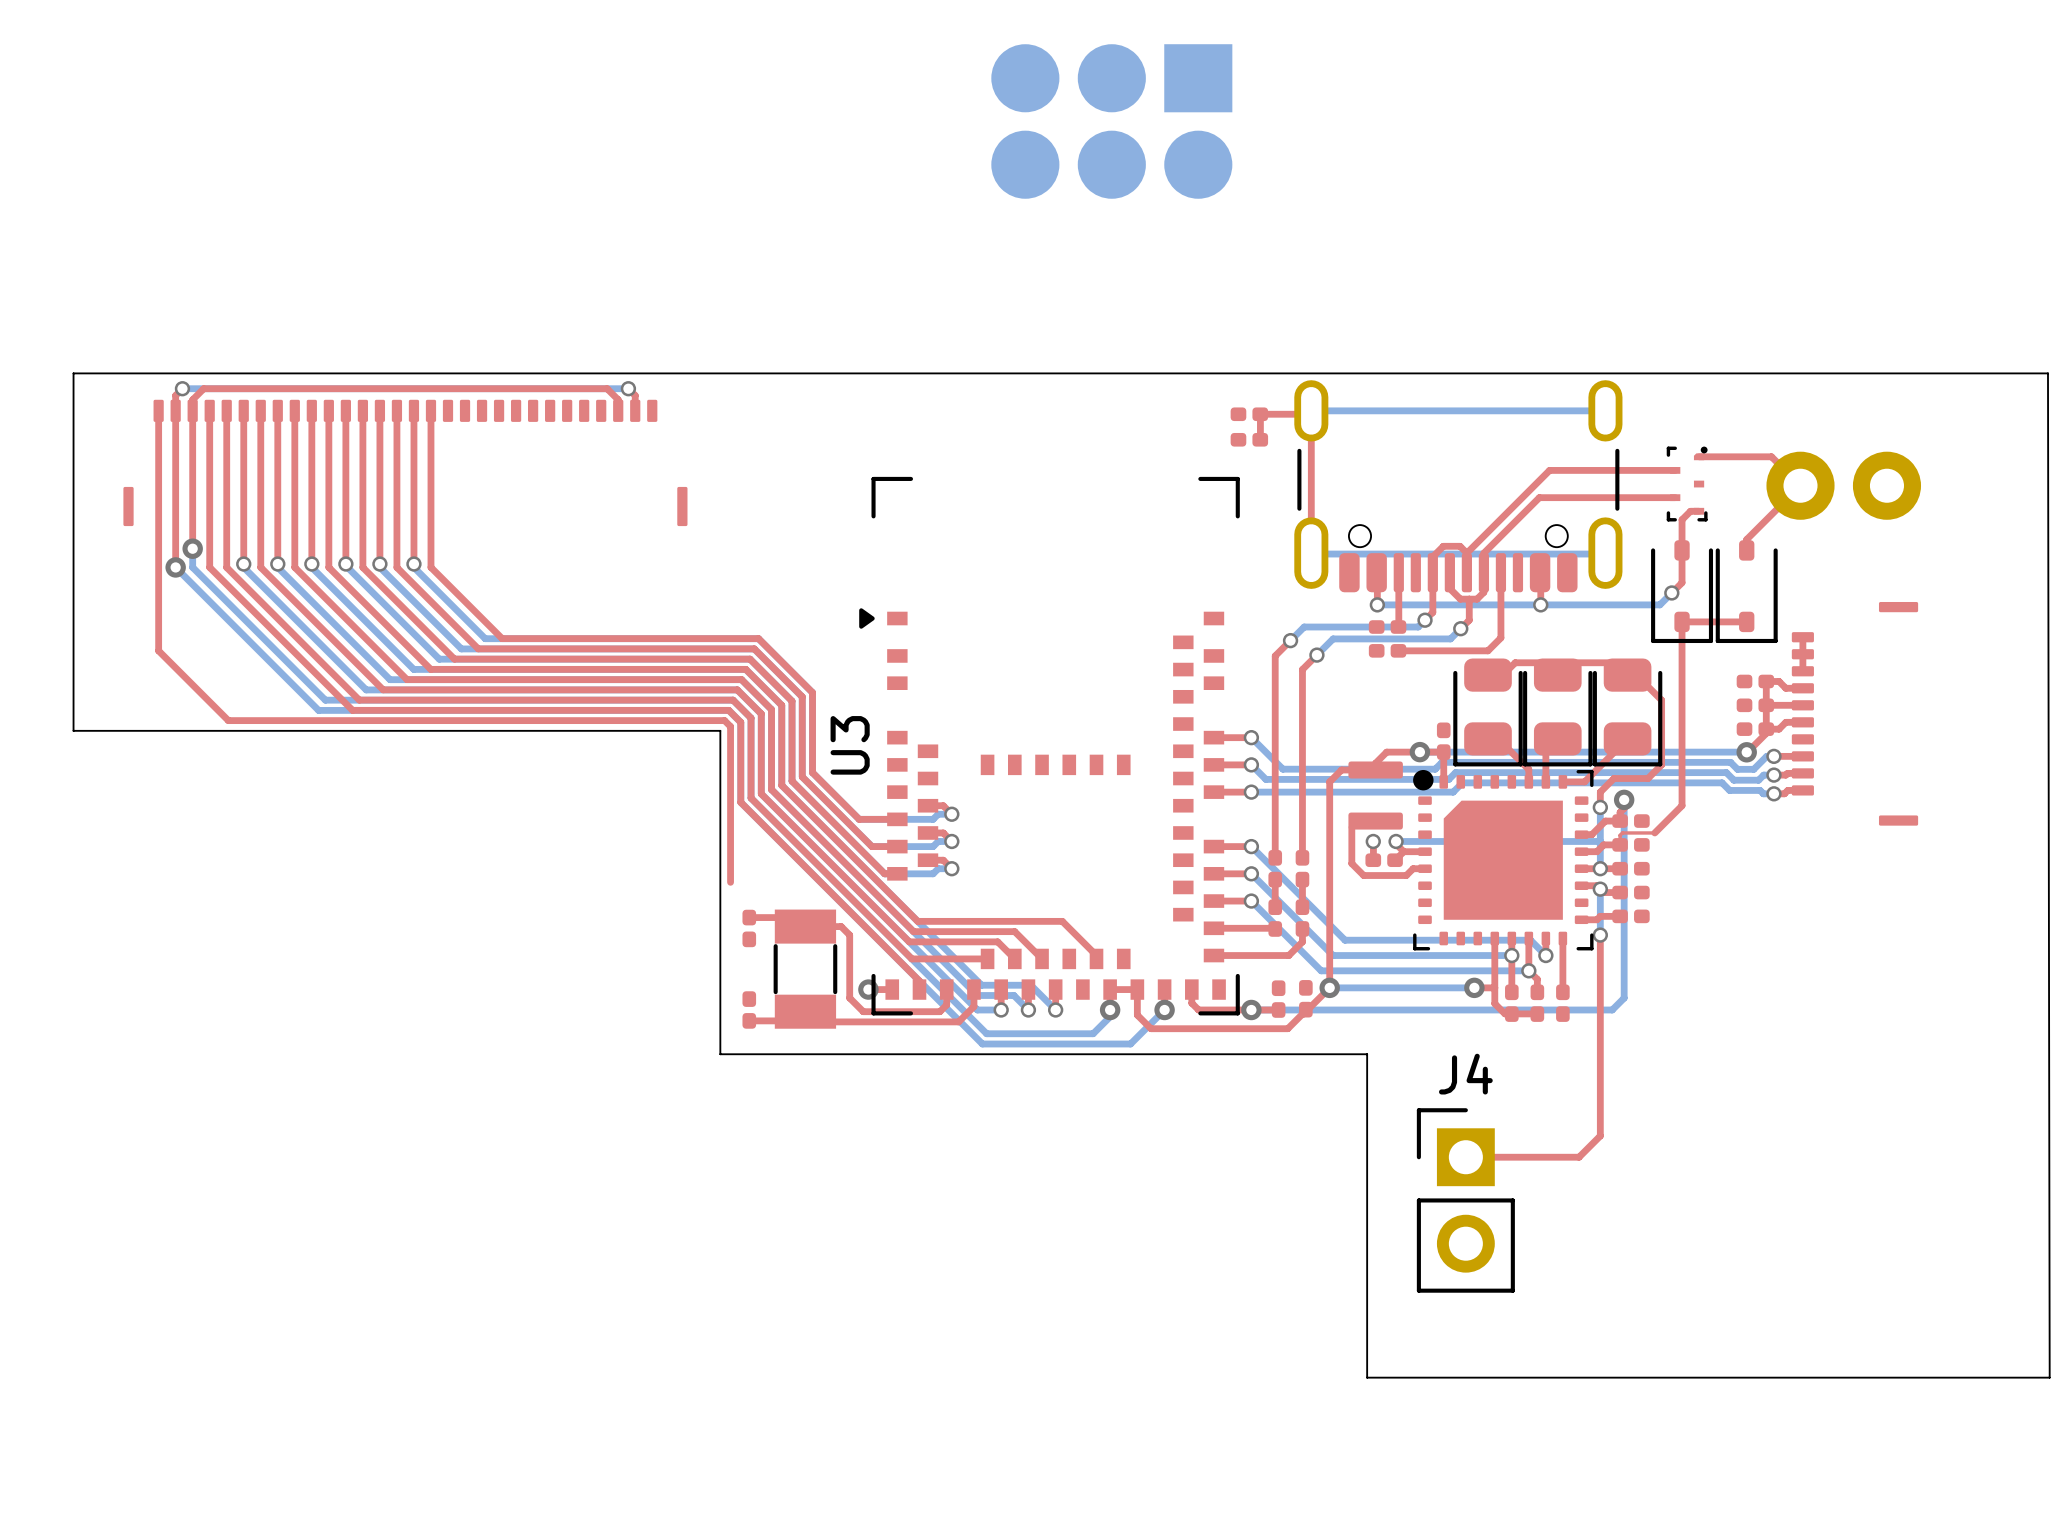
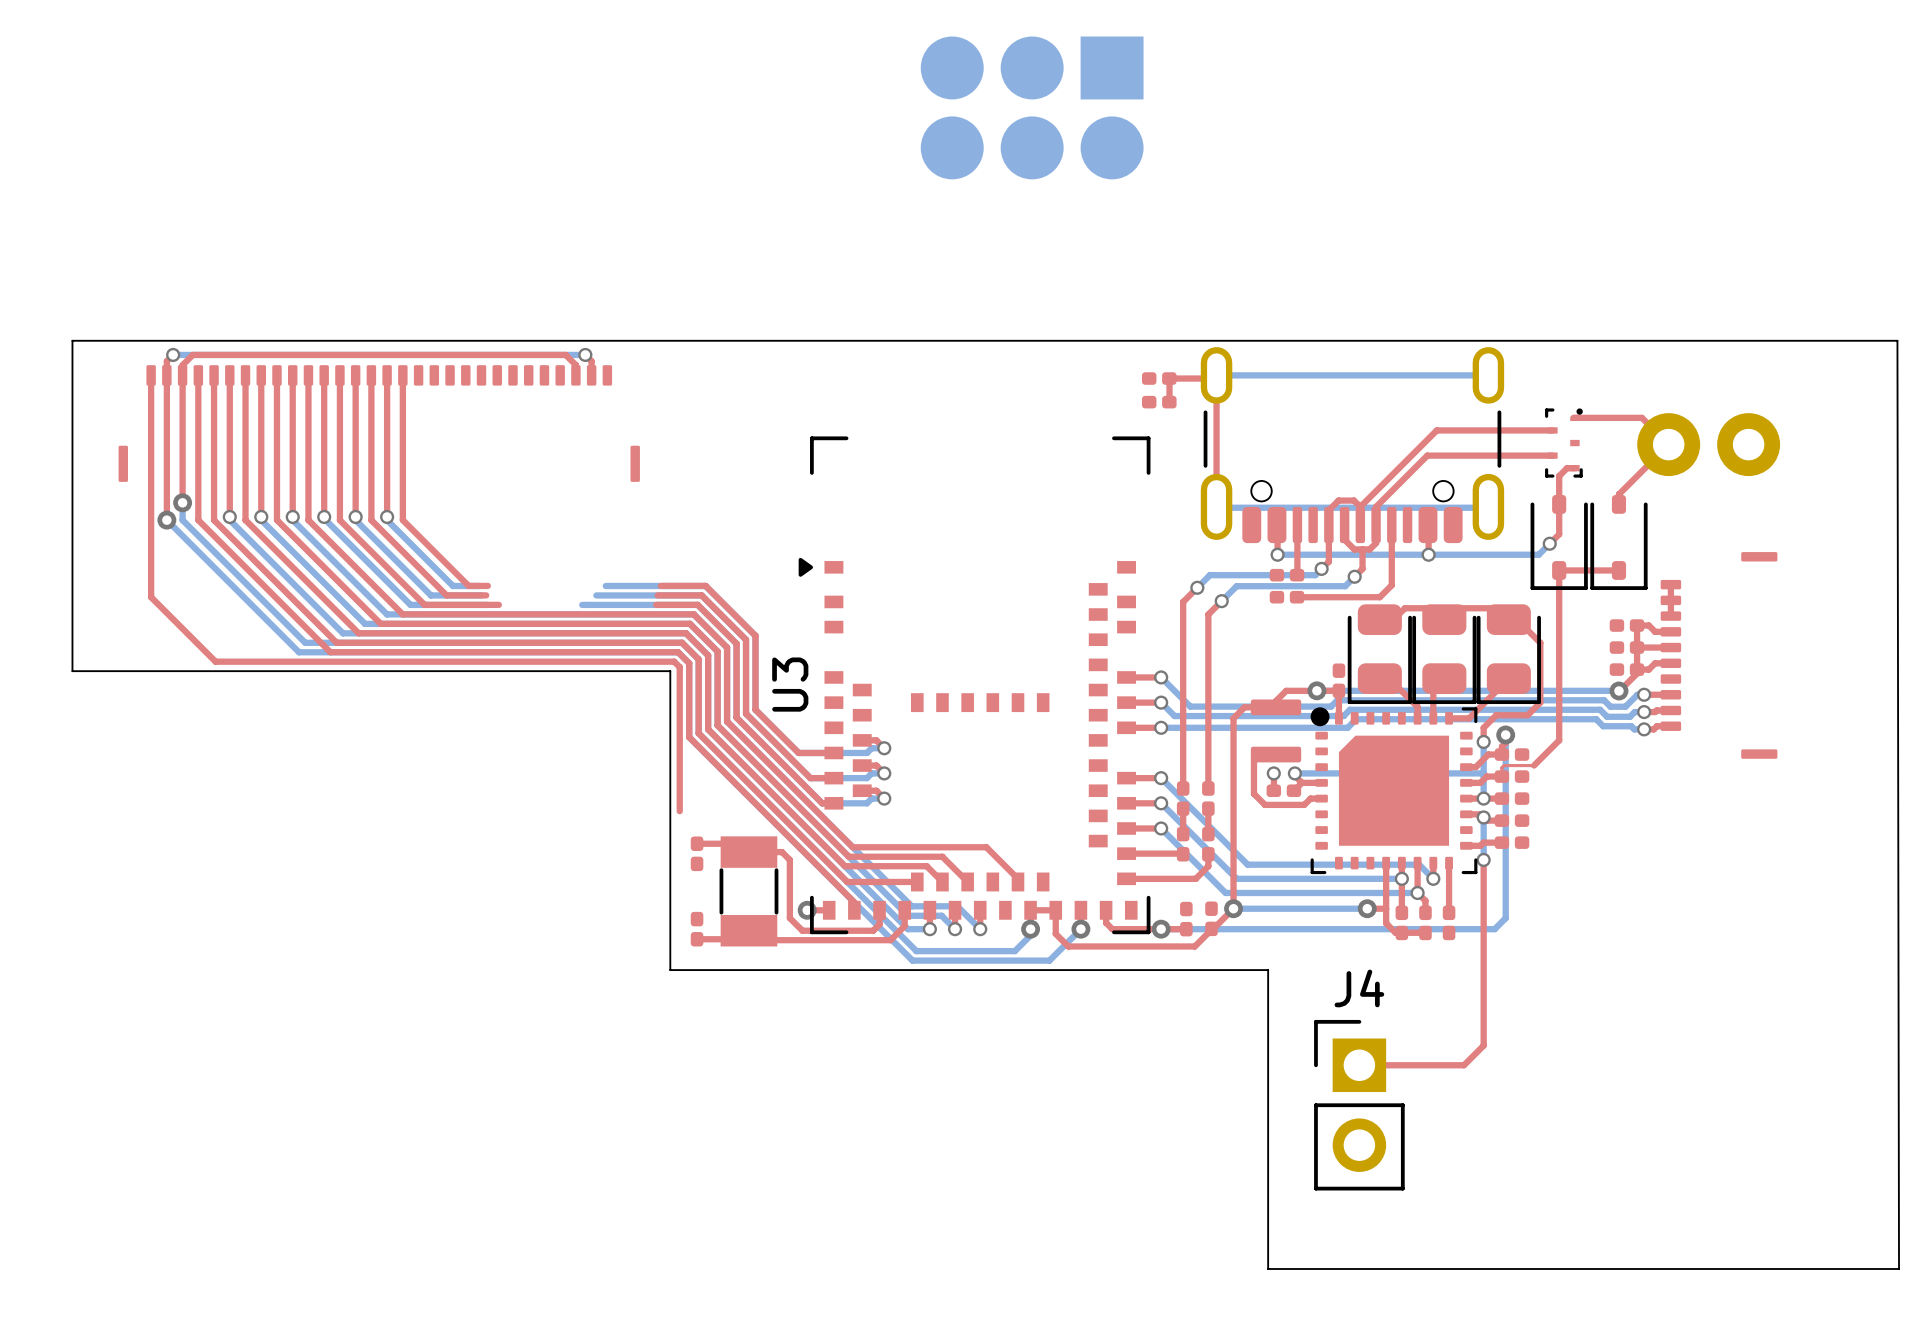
top track: (522, 638) (710, 638) -> none
top track: (521, 648) (706, 648) -> none
top track: (534, 659) (705, 659) -> none

